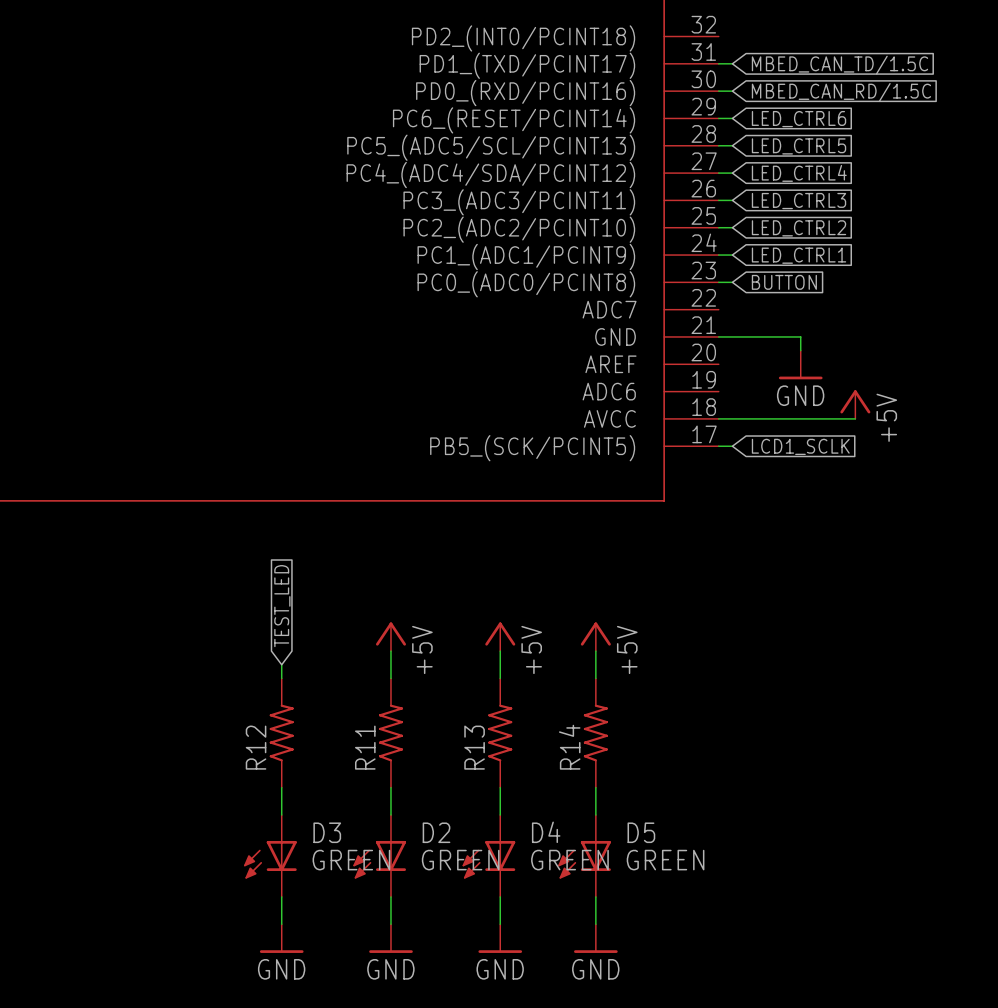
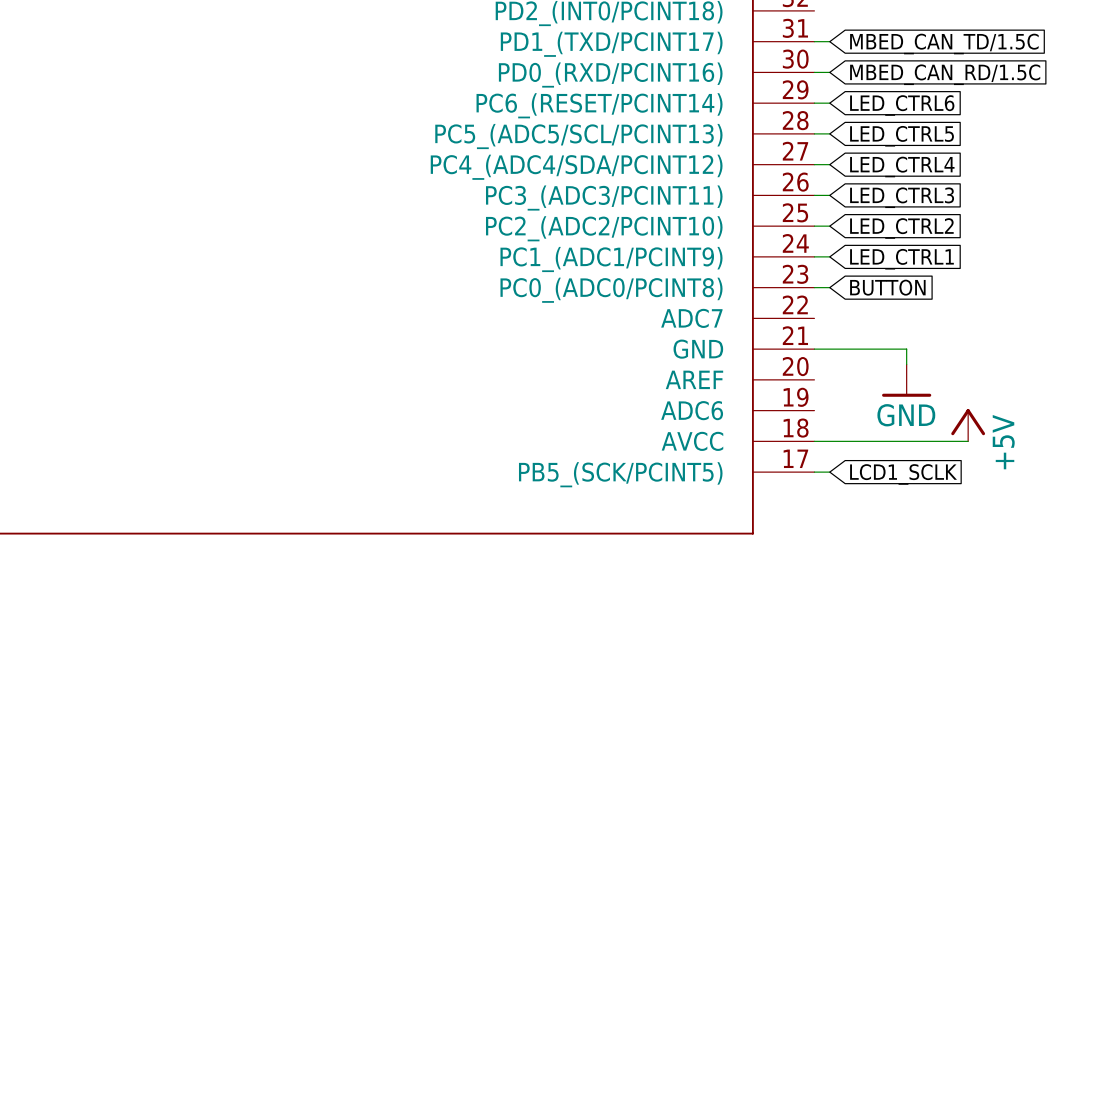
global label: TEST_LED (282, 606) -> none
power symbol: +5V (390, 636) -> none
power symbol: +5V (500, 636) -> none
power symbol: +5V (595, 636) -> none
wire: (390, 651) (390, 678) -> none
wire: (500, 651) (500, 678) -> none
wire: (595, 651) (595, 678) -> none
wire: (281, 664) (281, 678) -> none
R12: (281, 733) -> none
R11: (390, 733) -> none
R13: (500, 733) -> none
R14: (595, 733) -> none
wire: (281, 787) (281, 815) -> none
wire: (390, 787) (390, 815) -> none
wire: (500, 787) (500, 815) -> none
wire: (595, 787) (595, 815) -> none
D3: GREEN (270, 855) -> none
D2: GREEN (379, 855) -> none
D4: GREEN (488, 855) -> none
D5: GREEN (584, 855) -> none
wire: (281, 896) (281, 924) -> none
wire: (390, 896) (390, 924) -> none
wire: (500, 896) (500, 924) -> none
wire: (595, 896) (595, 924) -> none
power symbol: GND (281, 938) -> none
power symbol: GND (390, 938) -> none
power symbol: GND (500, 938) -> none
power symbol: GND (595, 938) -> none

